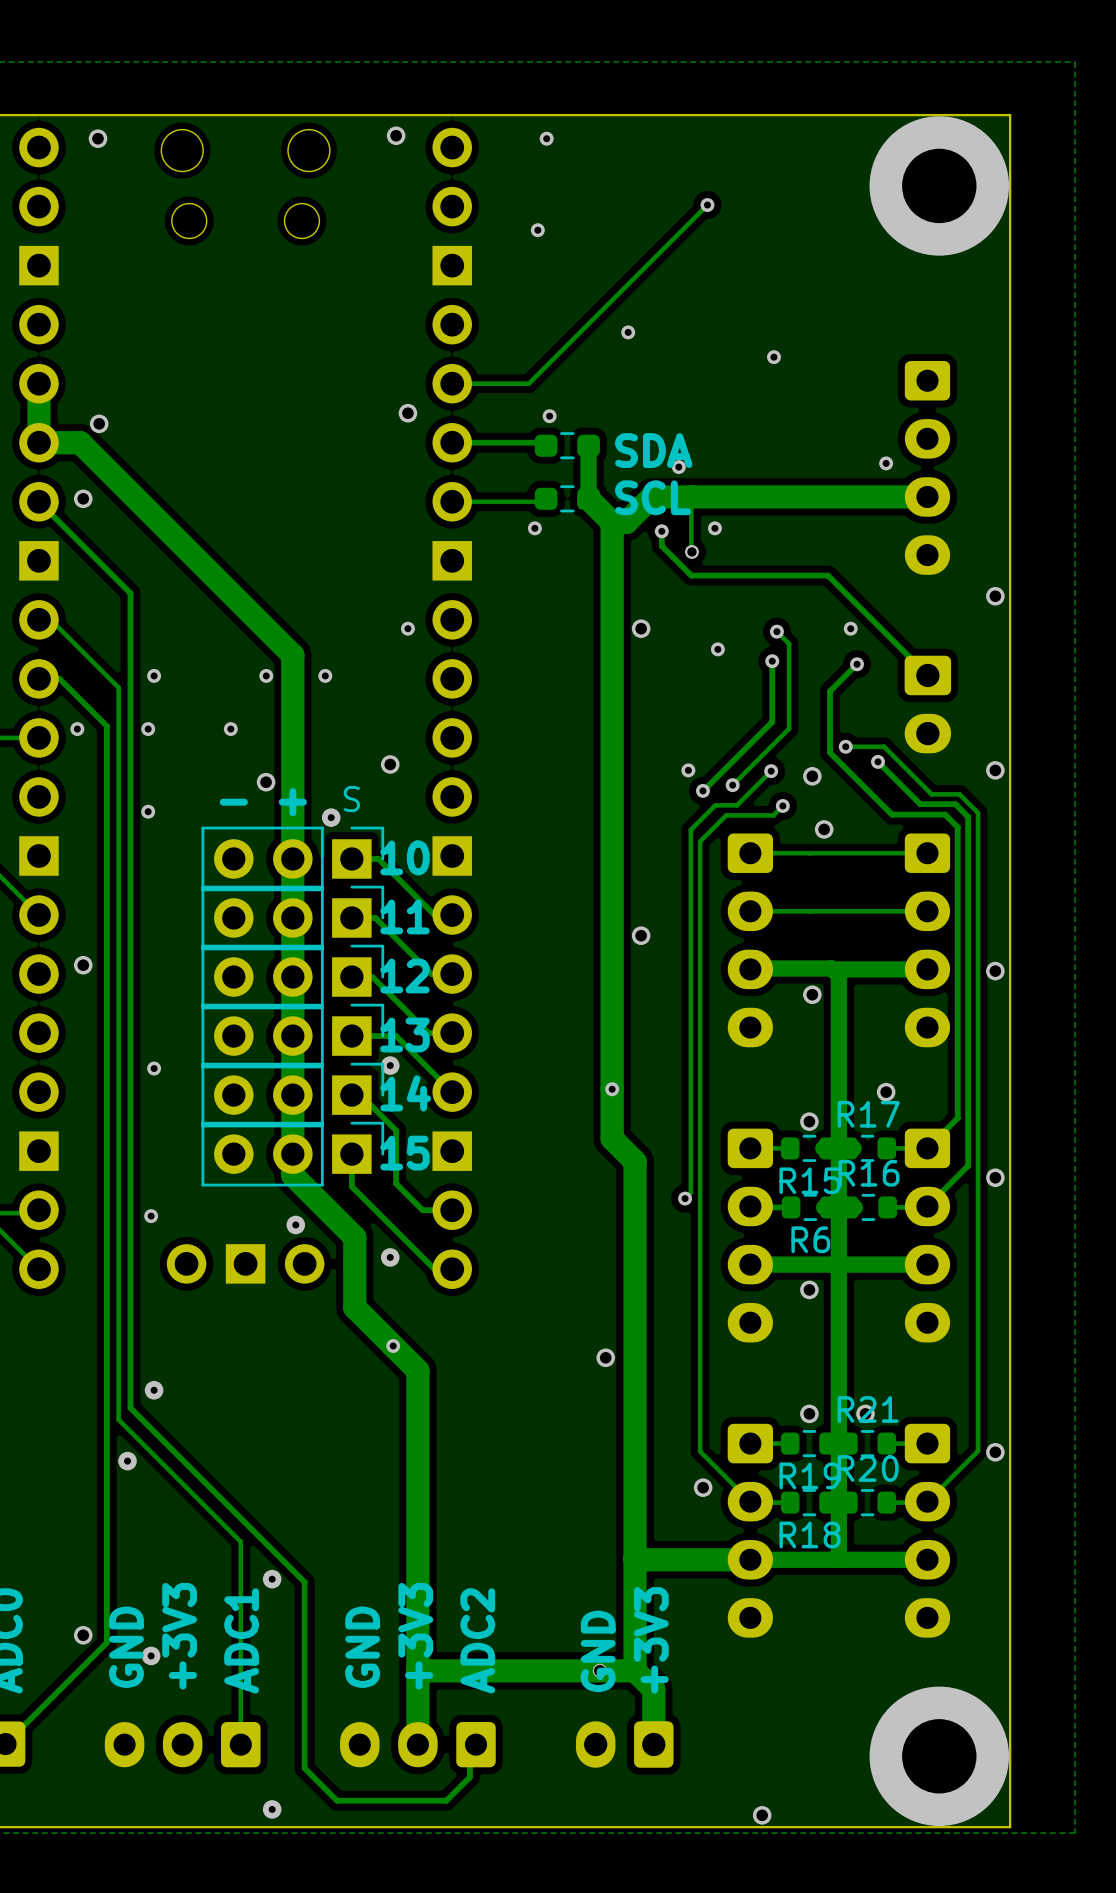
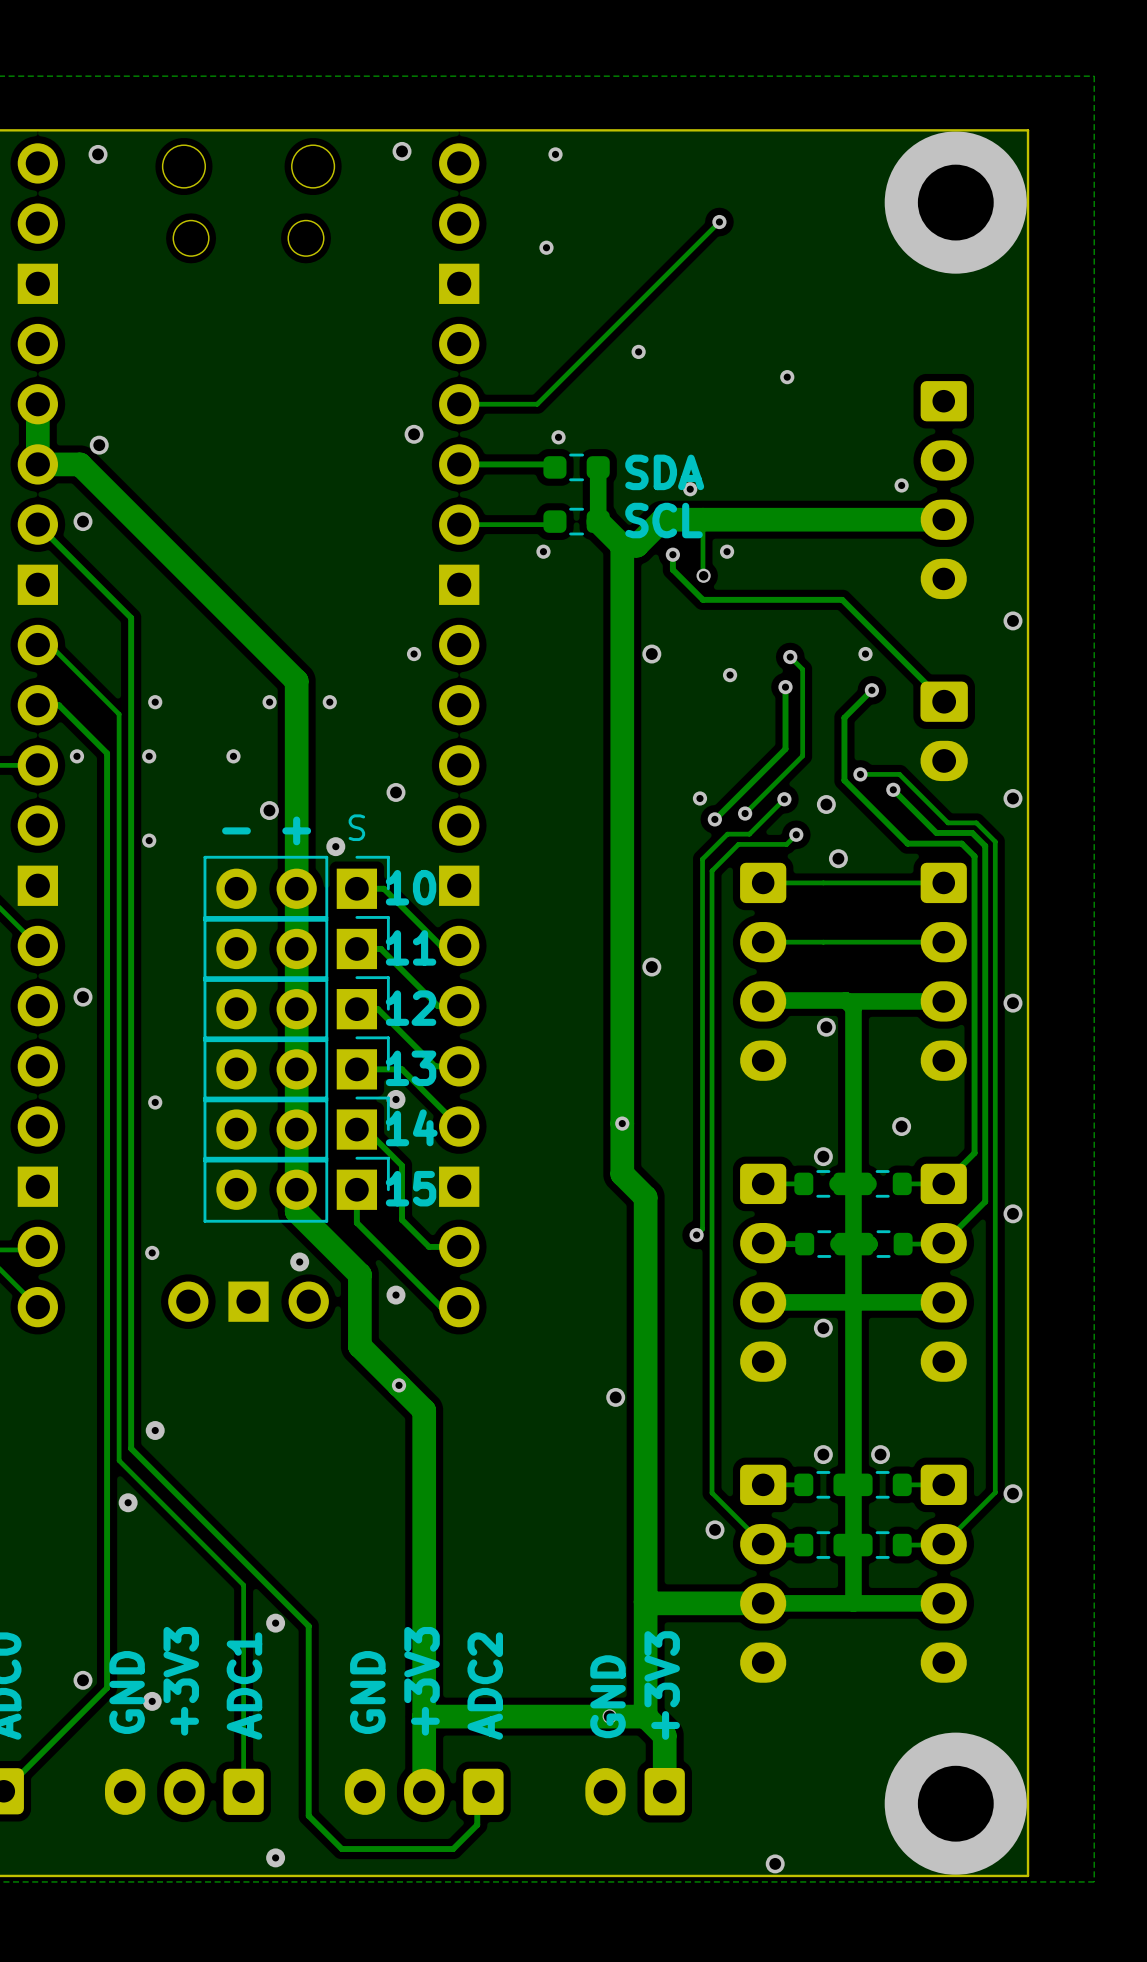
R17 name: R17 (868, 1114) -> none
R16 name: R16 (868, 1173) -> none
R15 name: R15 (809, 1180) -> none
R6 name: R6 (810, 1239) -> none
R21 name: R21 (868, 1409) -> none
R20 name: R20 (868, 1468) -> none
R19 name: R19 (809, 1475) -> none
R18 name: R18 (809, 1534) -> none

